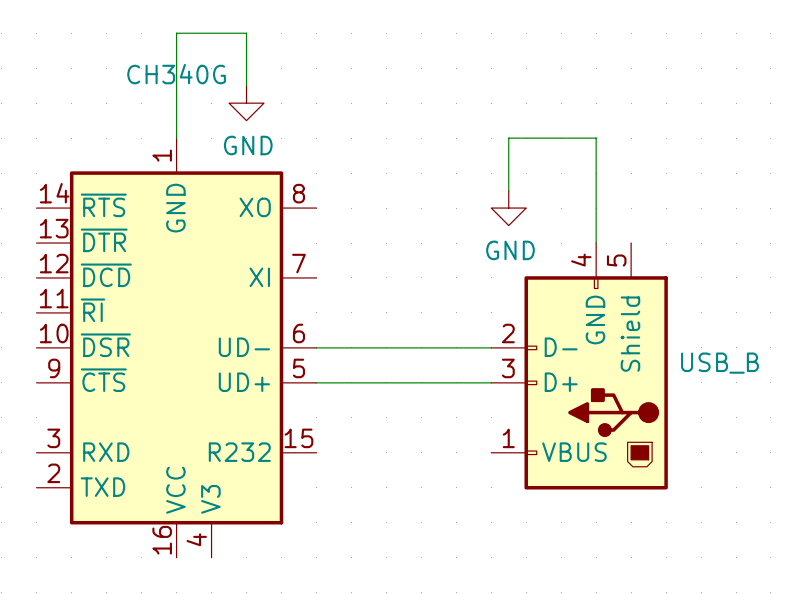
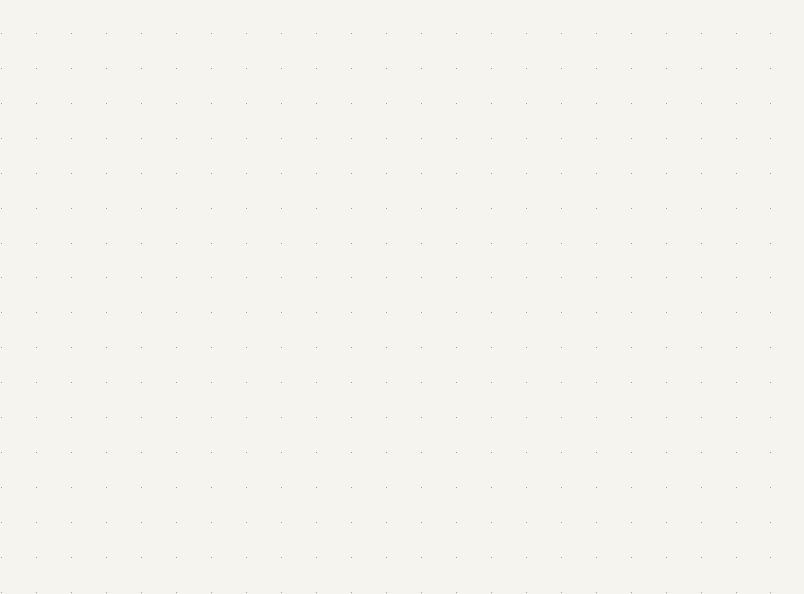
wire: (246, 85) (246, 33) (176, 33) (176, 138) -> none
power symbol: GND (246, 103) -> none
wire: (508, 190) (508, 138) (596, 138) (596, 243) -> none
power symbol: GND (508, 208) -> none
part: CH340G (176, 347) -> none
wire: (316, 347) (491, 347) -> none
part: USB_B (579, 366) -> none
wire: (316, 382) (491, 382) -> none

